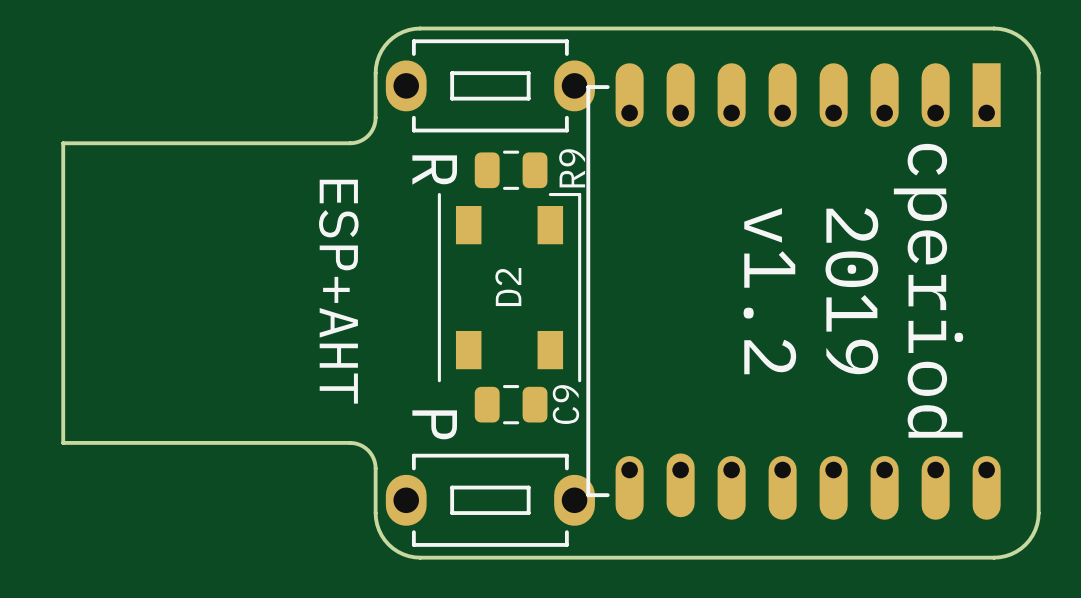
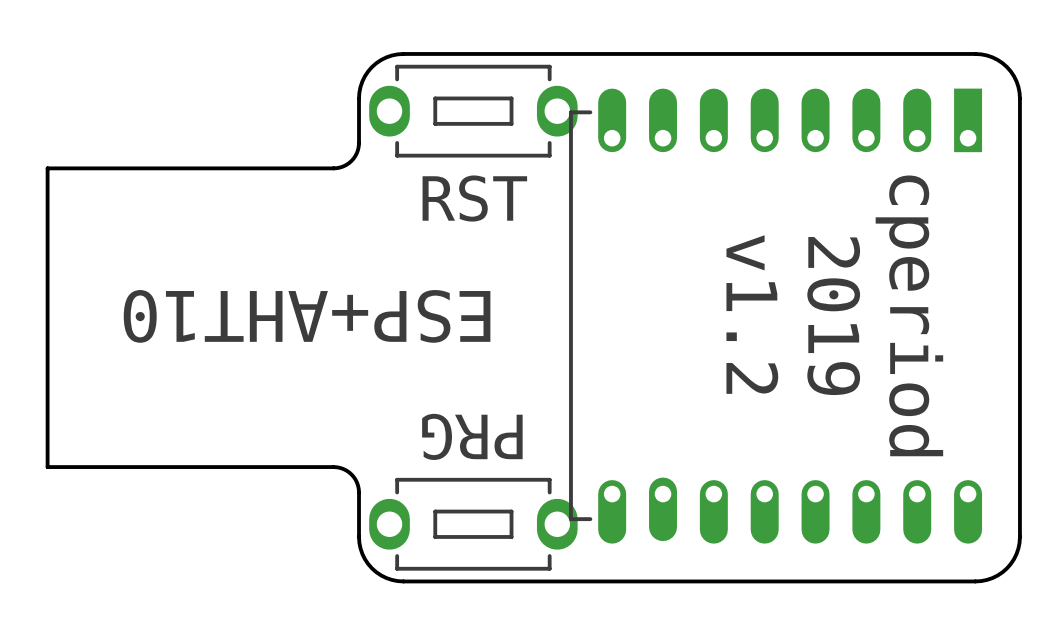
text: R (434, 170) -> none
R9: (511, 170) -> none
text: none -> RST (474, 198)
D2: (509, 287) -> none
text: ESP+AHT (338, 291) -> ESP+AHT10 (307, 316)
C9: (511, 404) -> none
text: none -> PRG (472, 436)
text: P (434, 424) -> none

